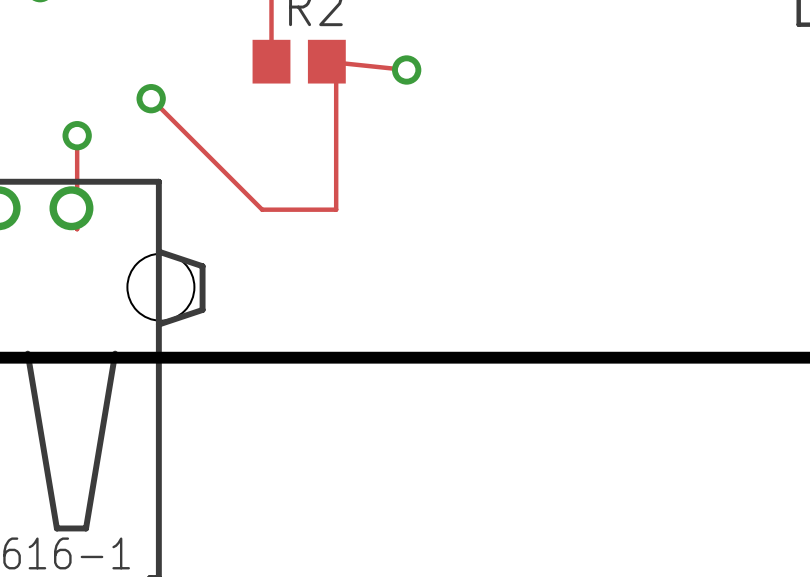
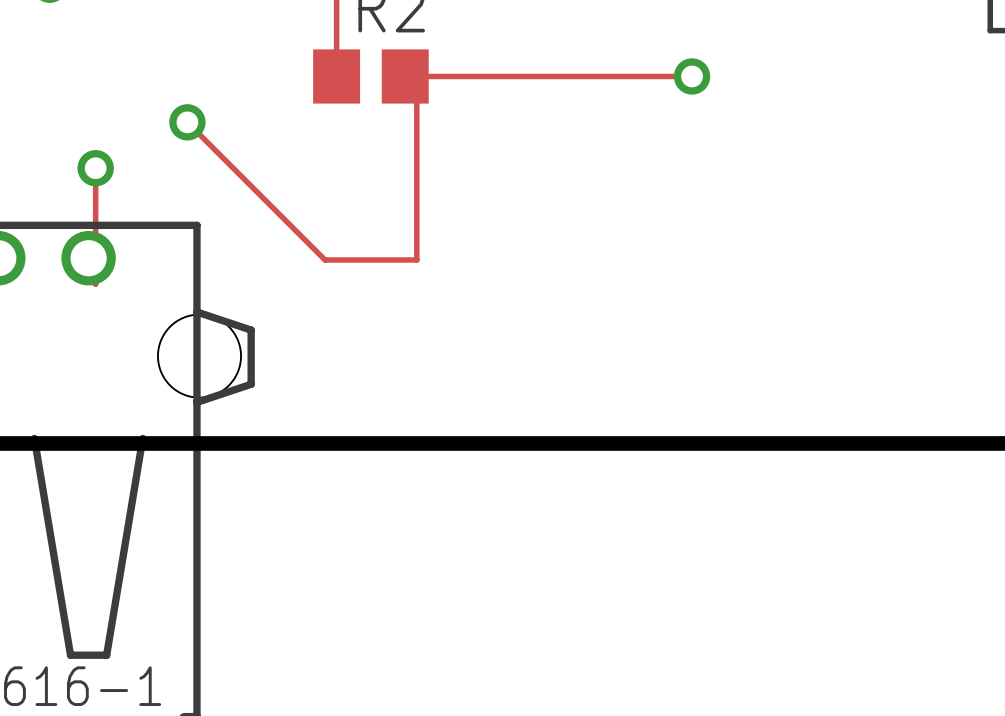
track: (326, 61) (406, 70) -> (405, 76) (692, 76)
via position: (406, 70) -> (692, 76)

